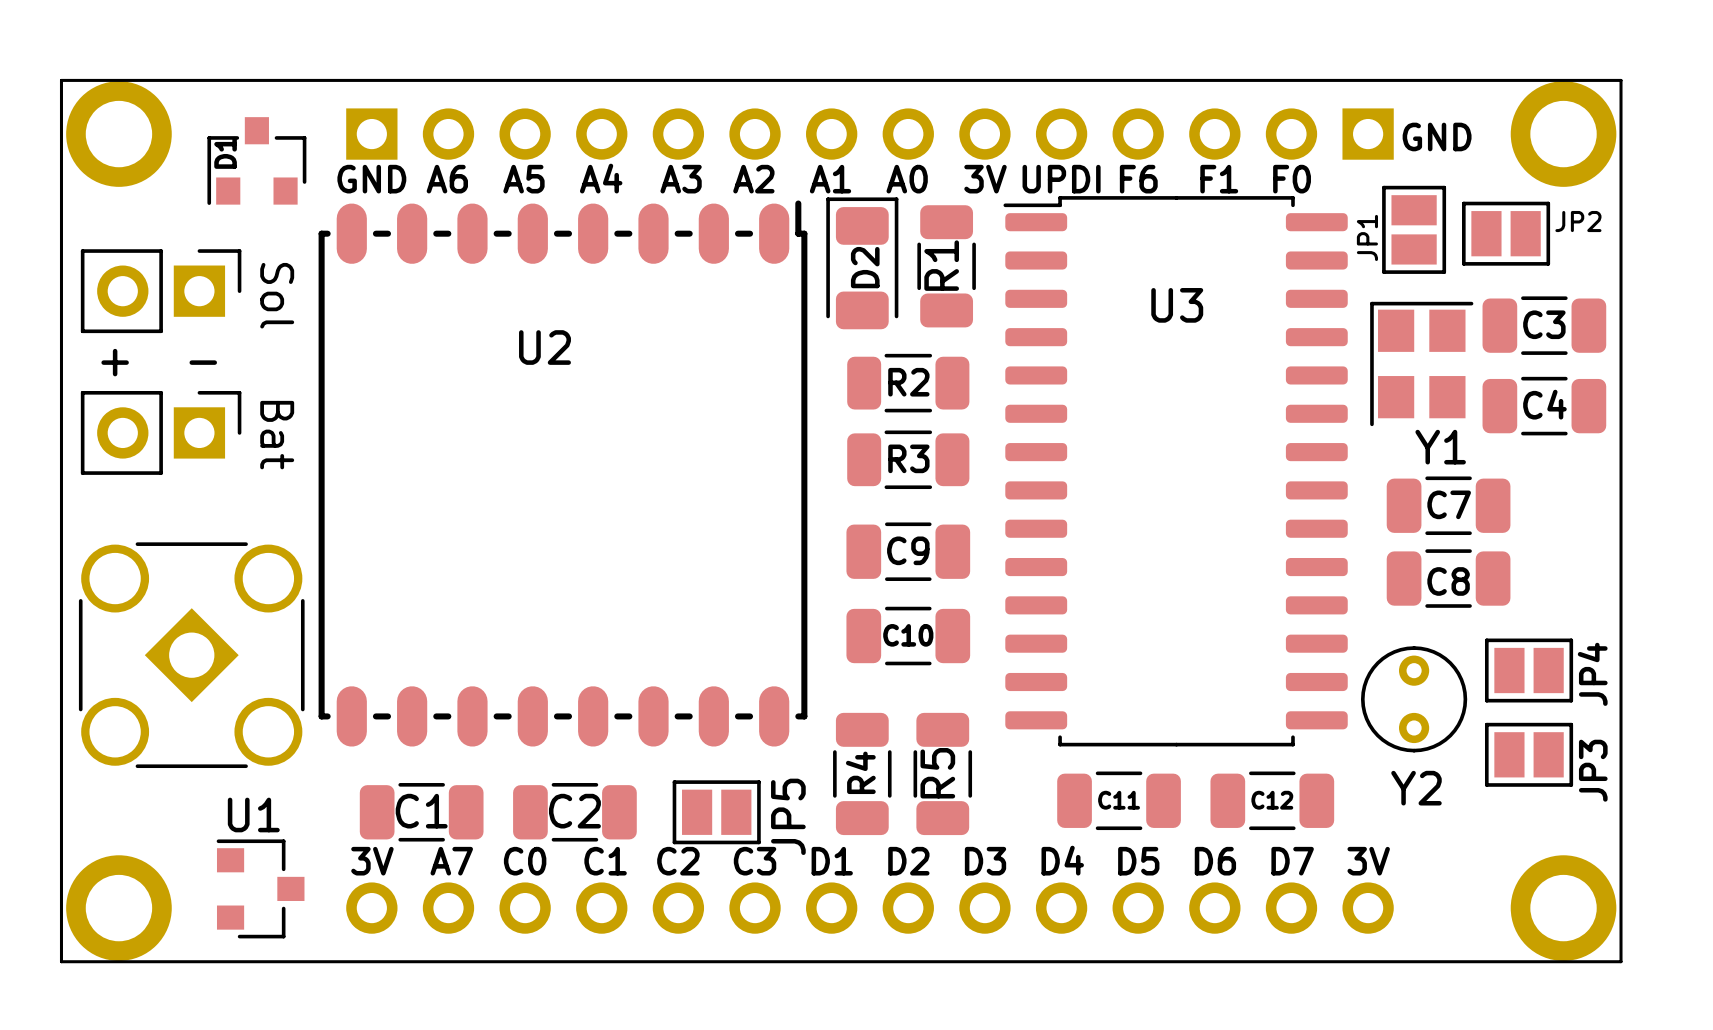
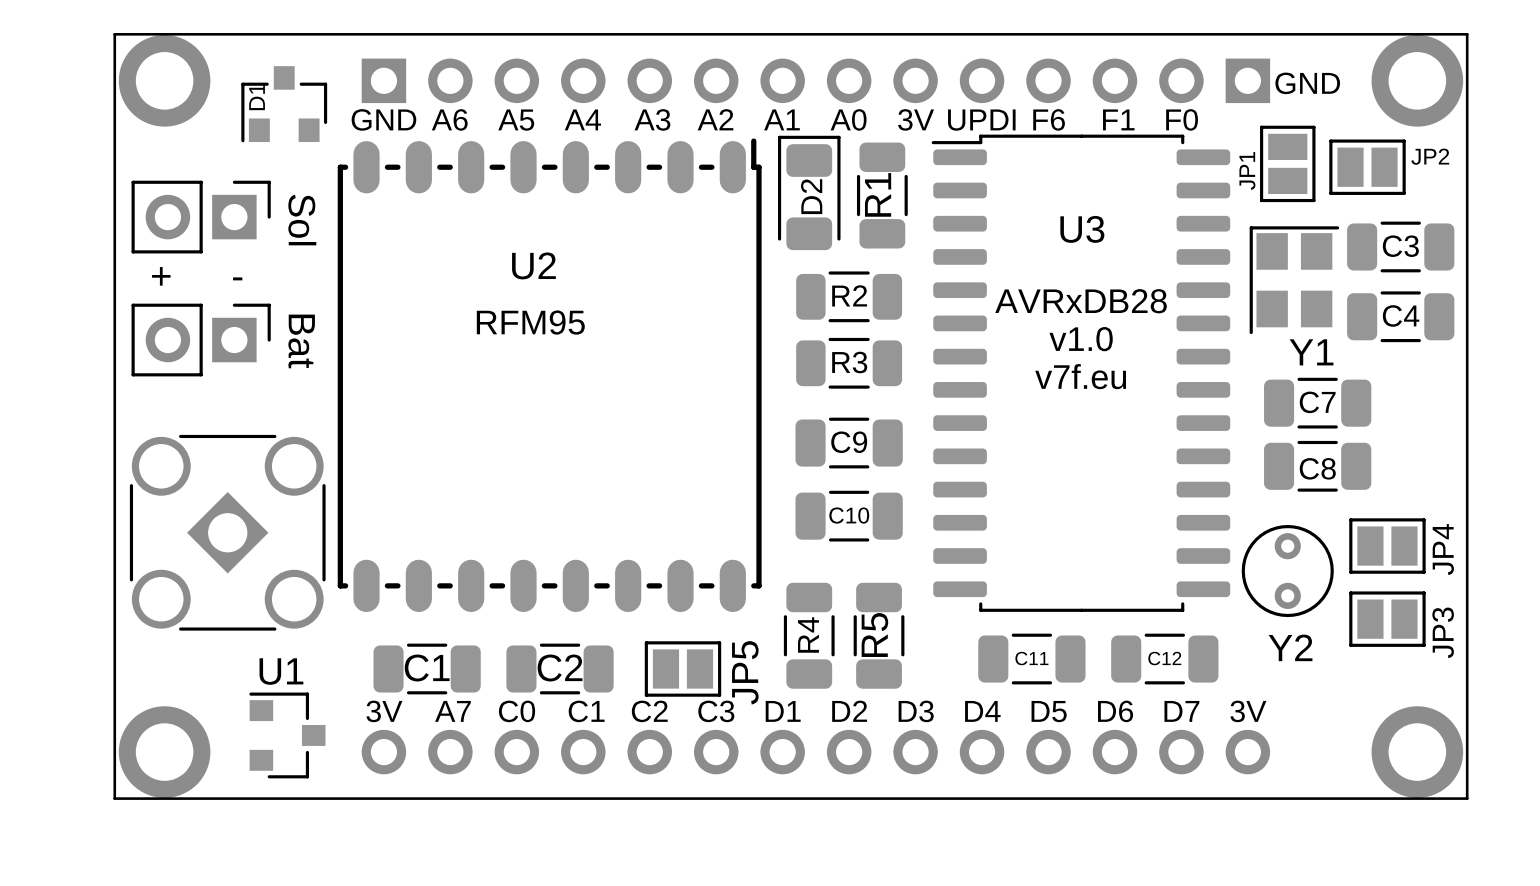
text: none -> AVRxDB28 (1081, 301)
text: none -> RFM95 (530, 322)
text: none -> v1.0 (1081, 339)
text: none -> v7f.eu (1080, 376)

